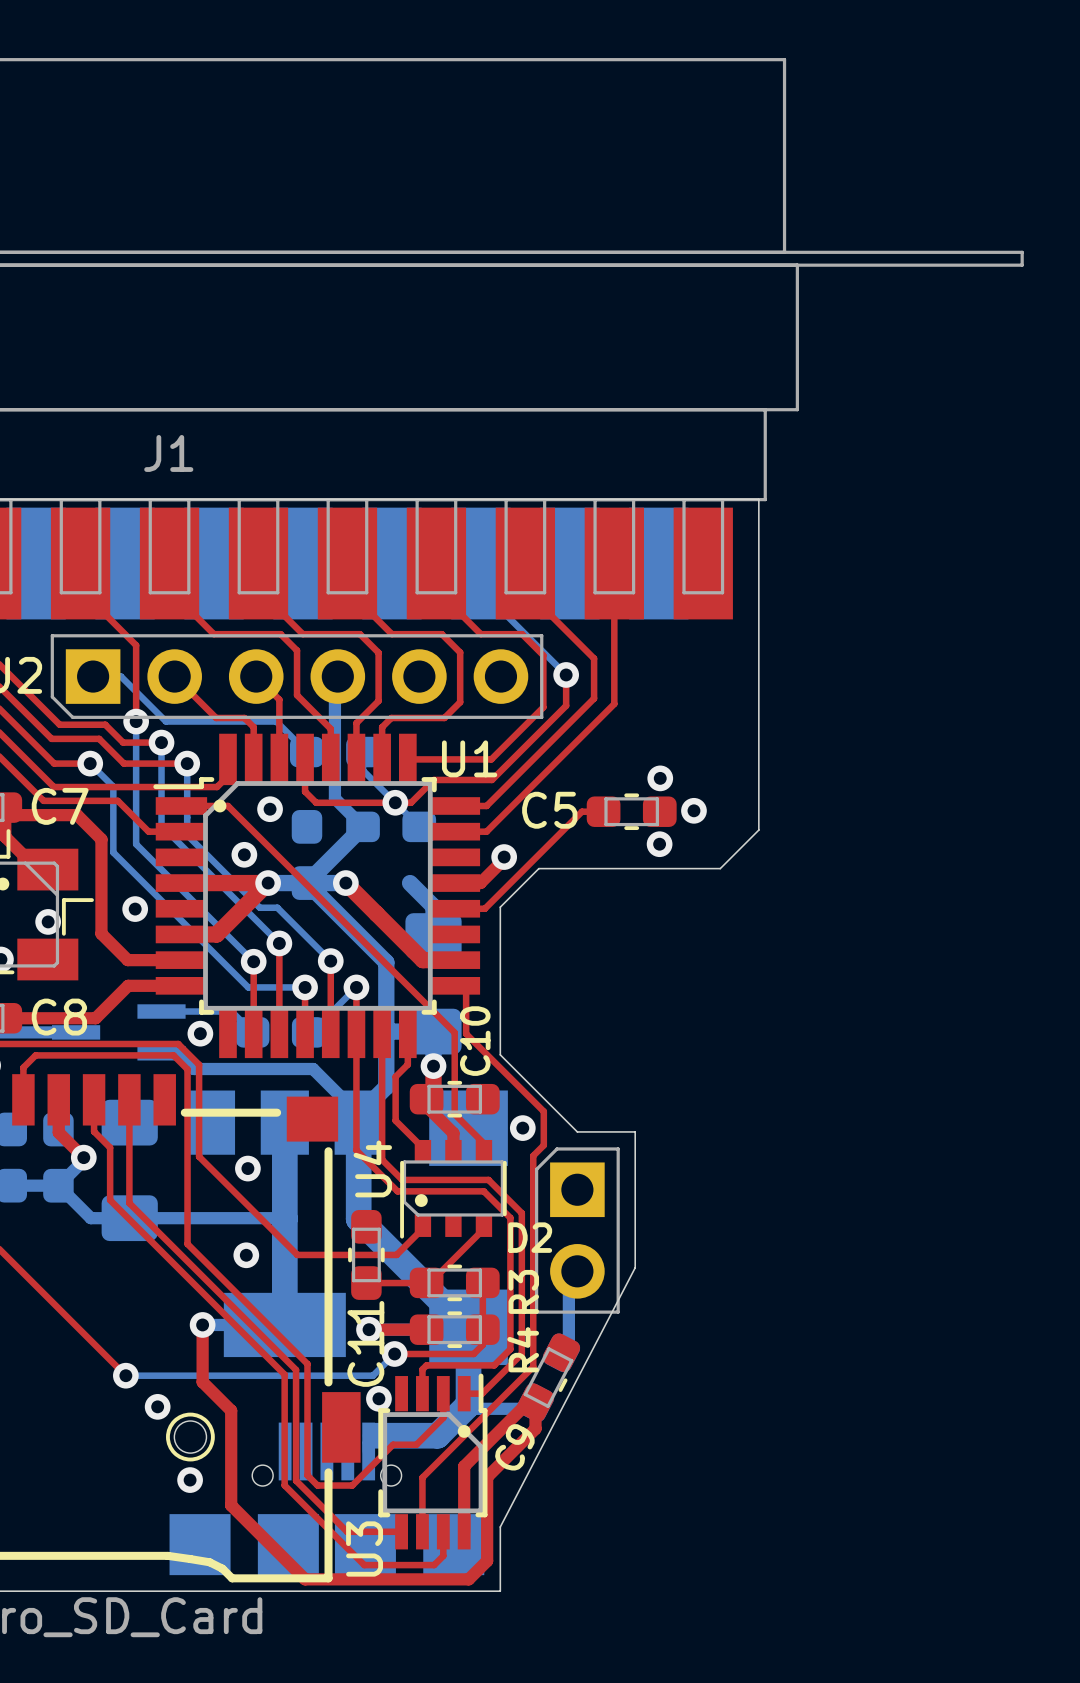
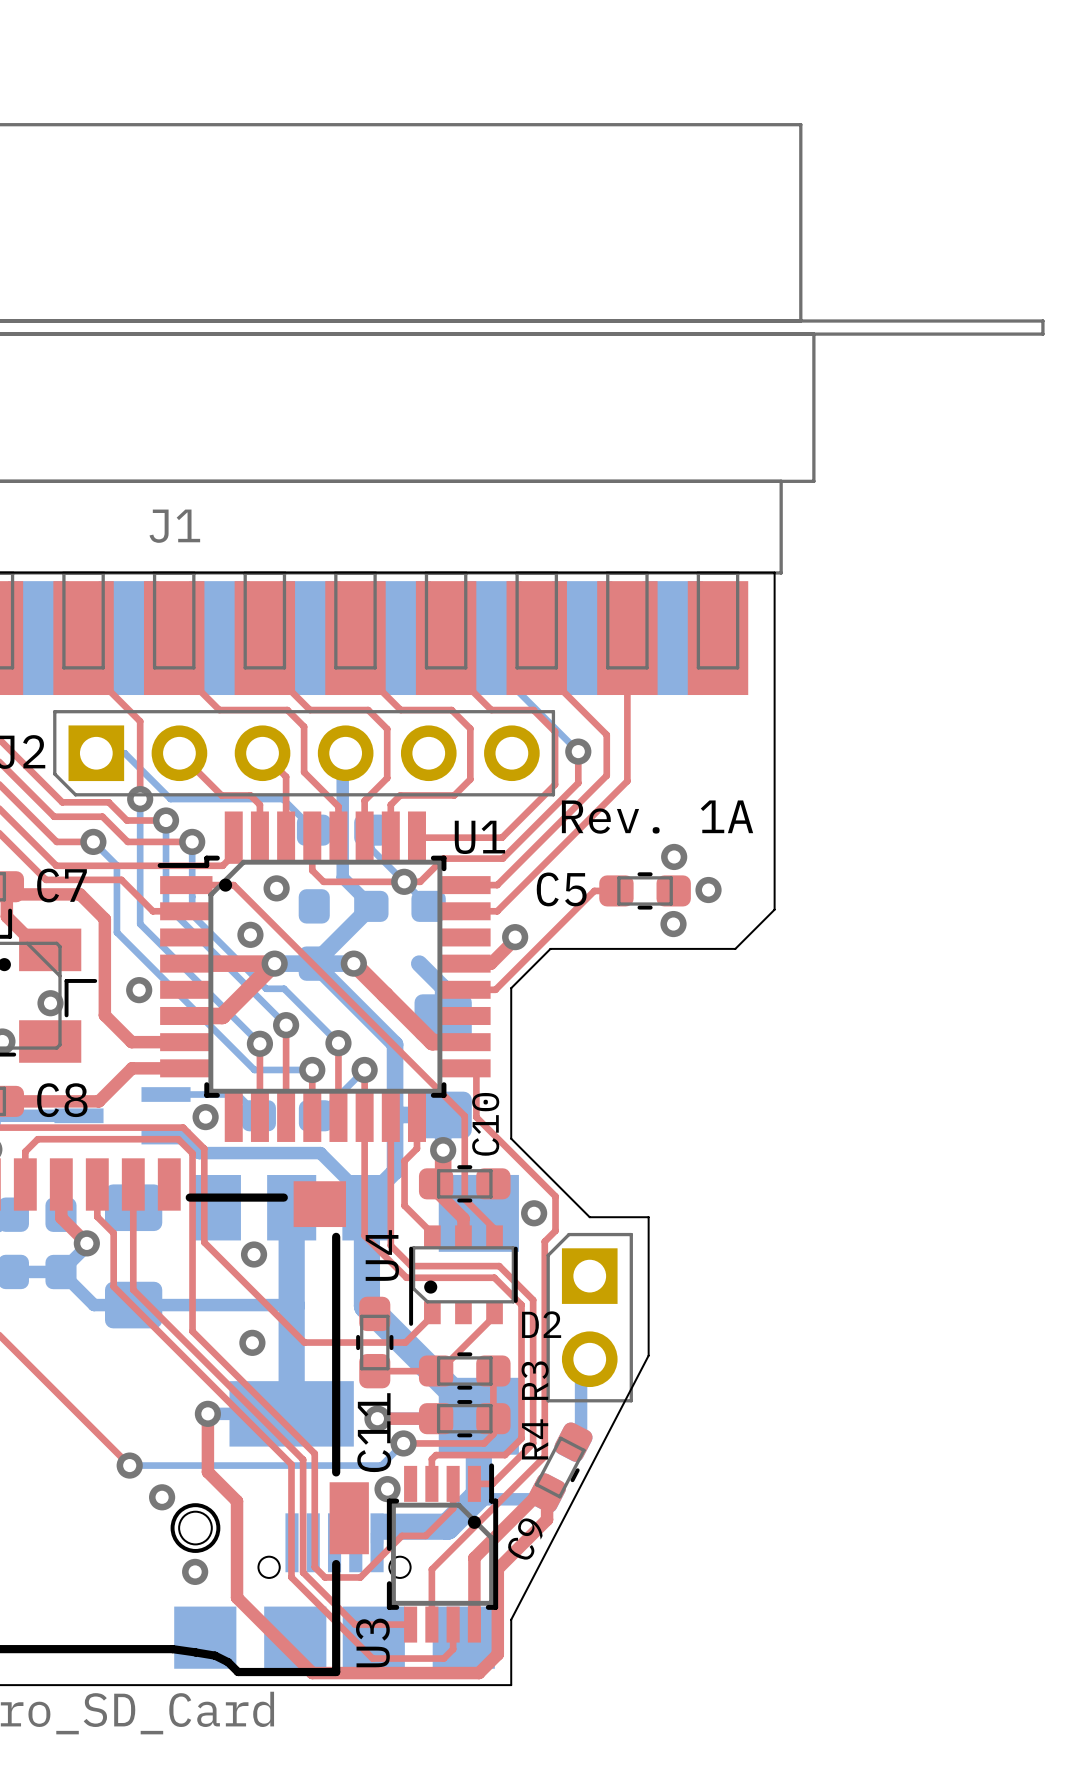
text: none -> Rev. 1A (657, 817)

